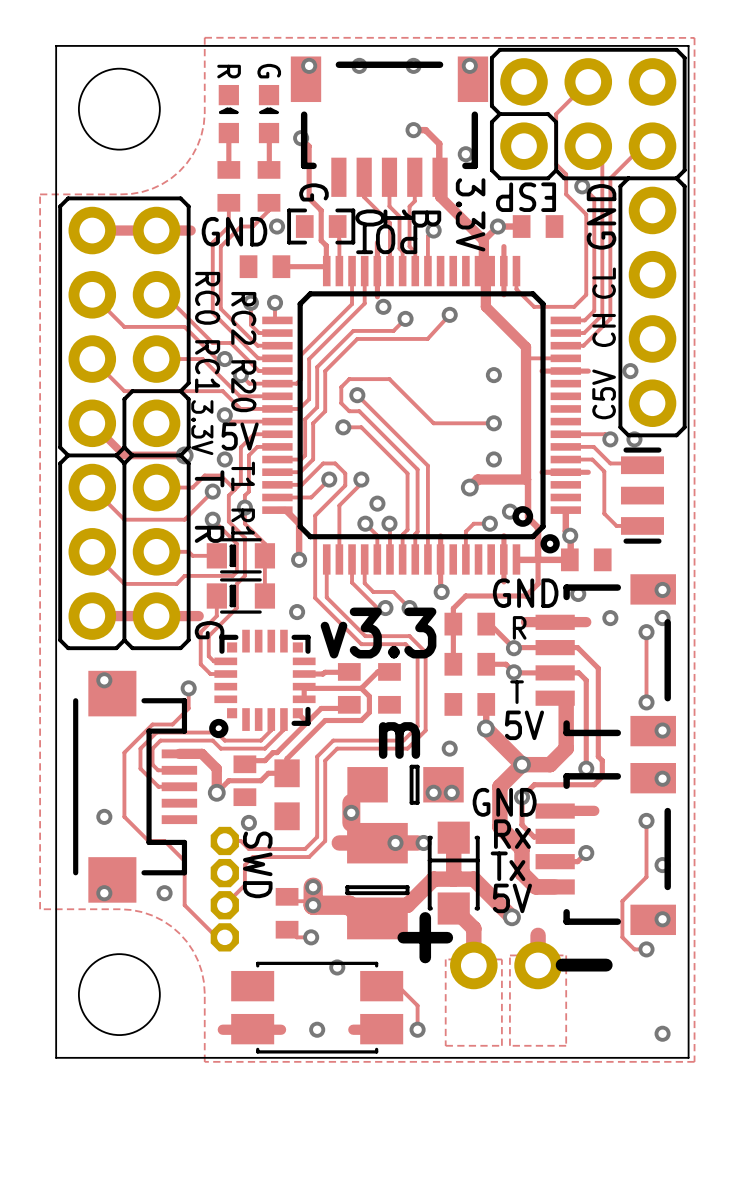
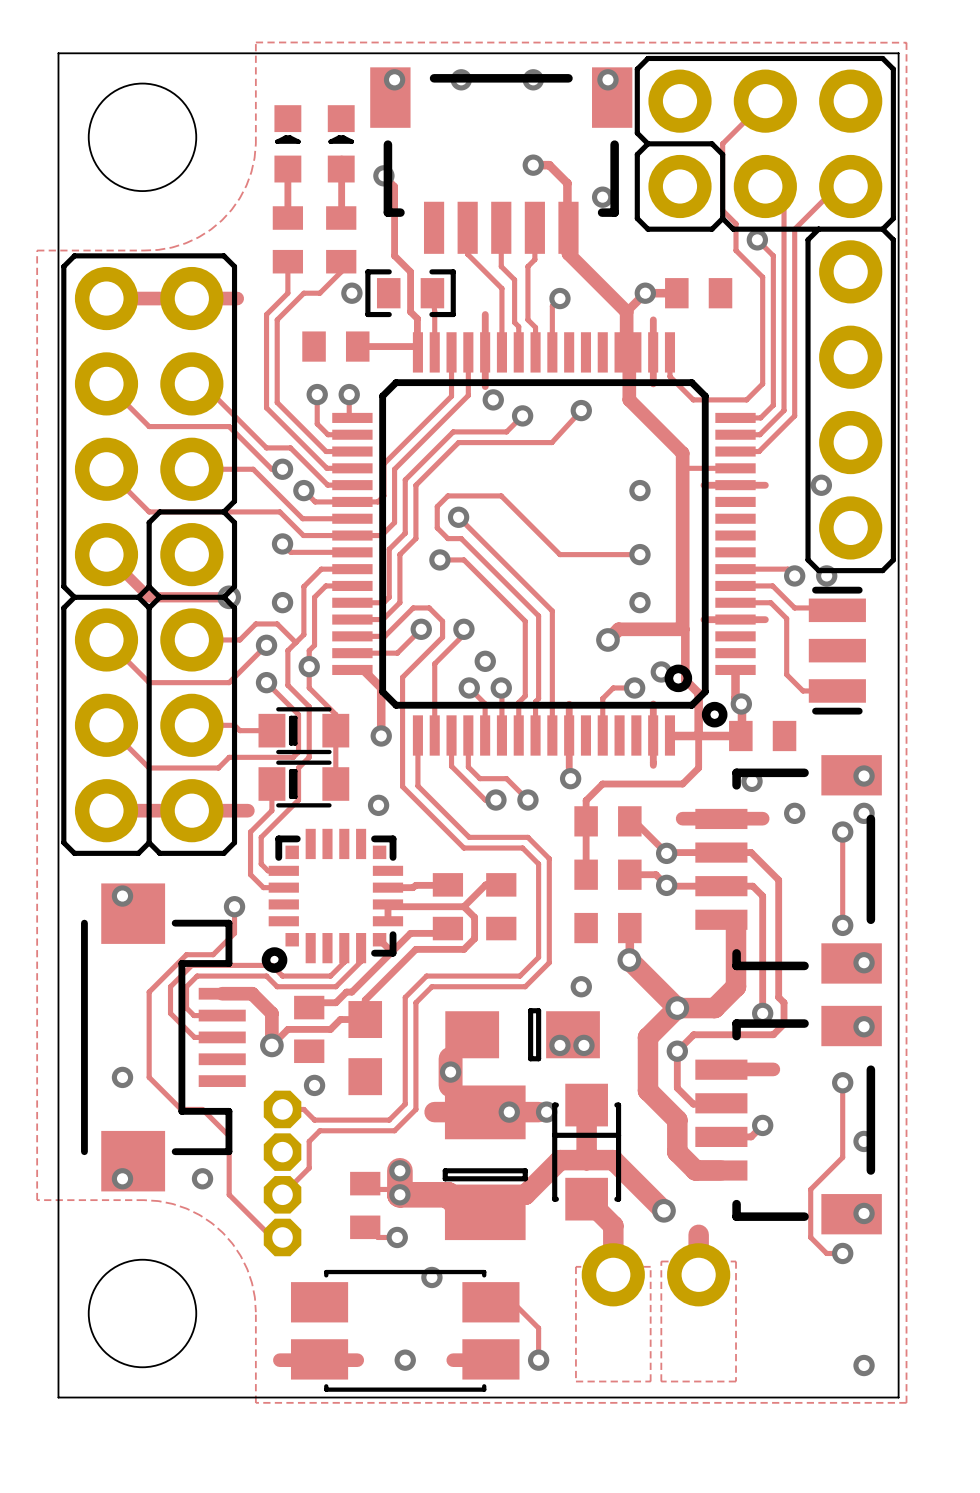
text: R (229, 71) -> none
text: G (269, 71) -> none
text: G (313, 192) -> none
text: ESP (526, 197) -> none
text: 3.3V (470, 214) -> none
text: GND (601, 216) -> none
text: 0 (370, 217) -> none
text: 1 (398, 217) -> none
text: B (426, 219) -> none
text: GND (234, 231) -> none
text: POT (386, 239) -> none
text: CL (604, 283) -> none
text: RC0 (207, 298) -> none
text: RC2 (243, 318) -> none
text: CH (604, 330) -> none
text: RC1 (207, 366) -> none
text: R20 (243, 386) -> none
text: C5V (604, 394) -> none
text: 3.3V (202, 427) -> none
text: 5V (240, 436) -> none
text: T1 (243, 476) -> none
text: T (209, 478) -> none
text: R1 (243, 524) -> none
text: R (209, 534) -> none
text: GND (525, 593) -> none
text: R (519, 627) -> none
text: G (209, 630) -> none
text: v3.3 (378, 633) -> none
text: T (517, 692) -> none
text: 5V (524, 725) -> none
text: m (399, 740) -> none
text: GND (504, 802) -> none
text: Rx (512, 834) -> none
text: SWD (257, 864) -> none
text: Tx (508, 866) -> none
text: 5V (512, 898) -> none
text: + (425, 937) -> none
text: - (584, 965) -> none

